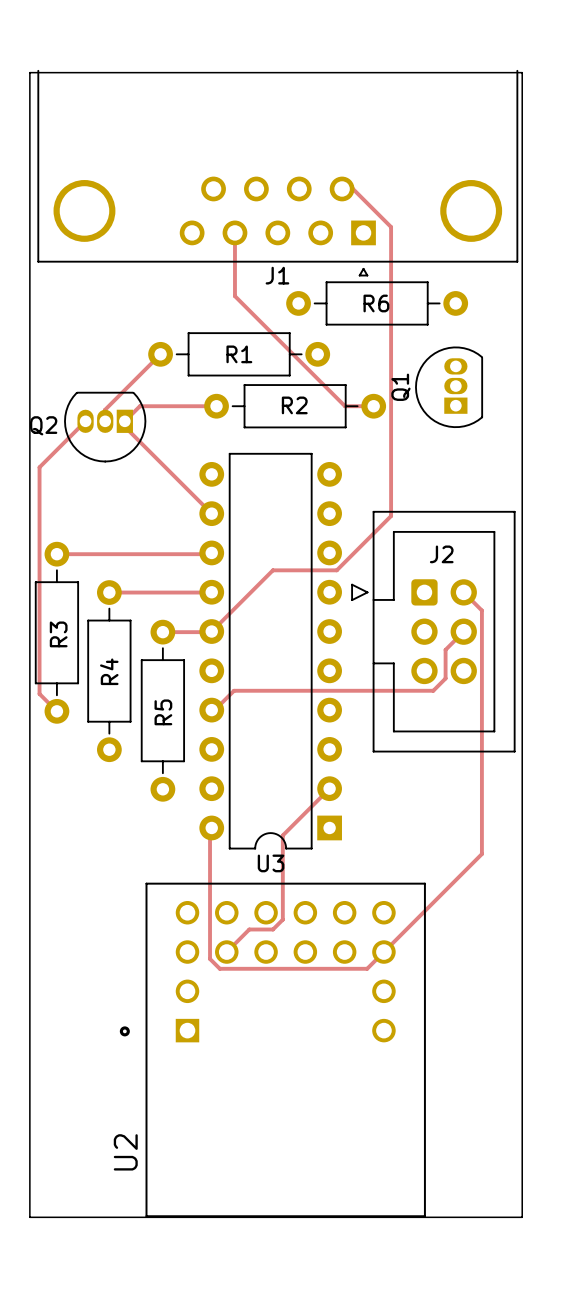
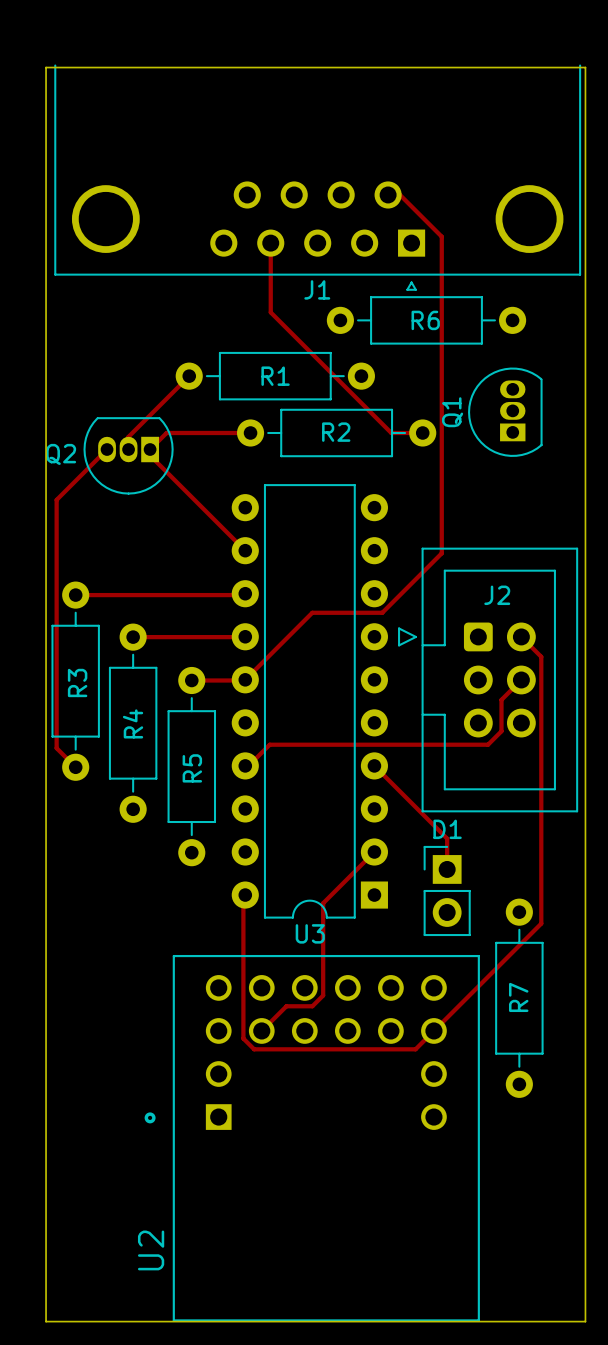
track: none -> (374, 765) (447, 838) (447, 869)
D1: none -> (447, 890)
R7: none -> (519, 998)

